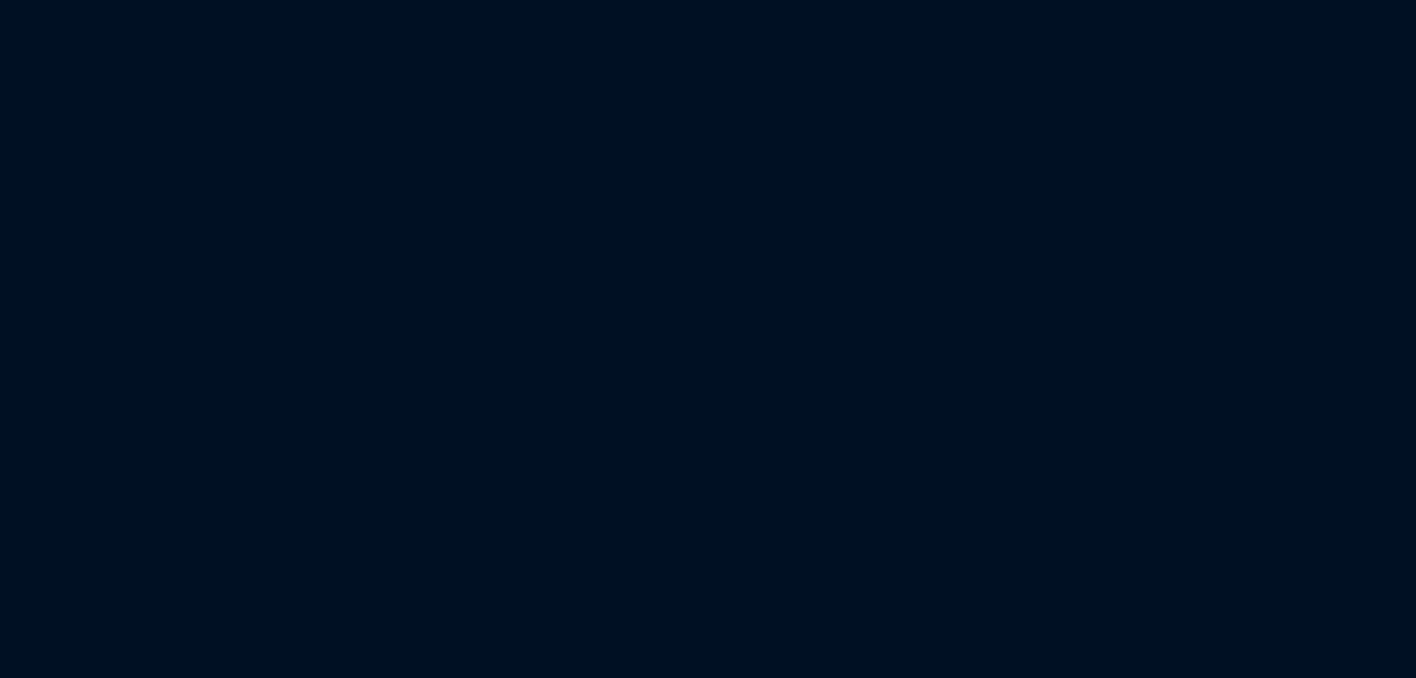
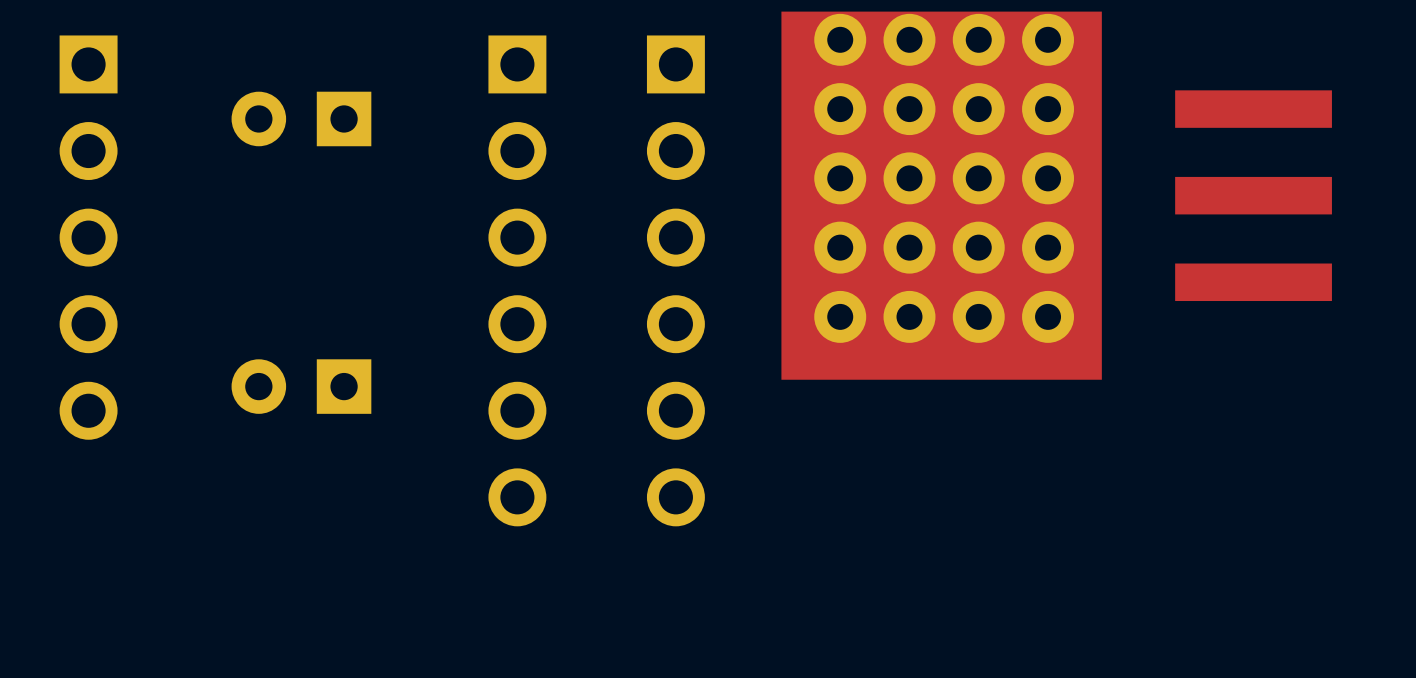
part: none -> (301, 118)
part: none -> (1056, 195)
part: none -> (88, 237)
part: none -> (517, 280)
part: none -> (675, 280)
part: none -> (301, 386)

